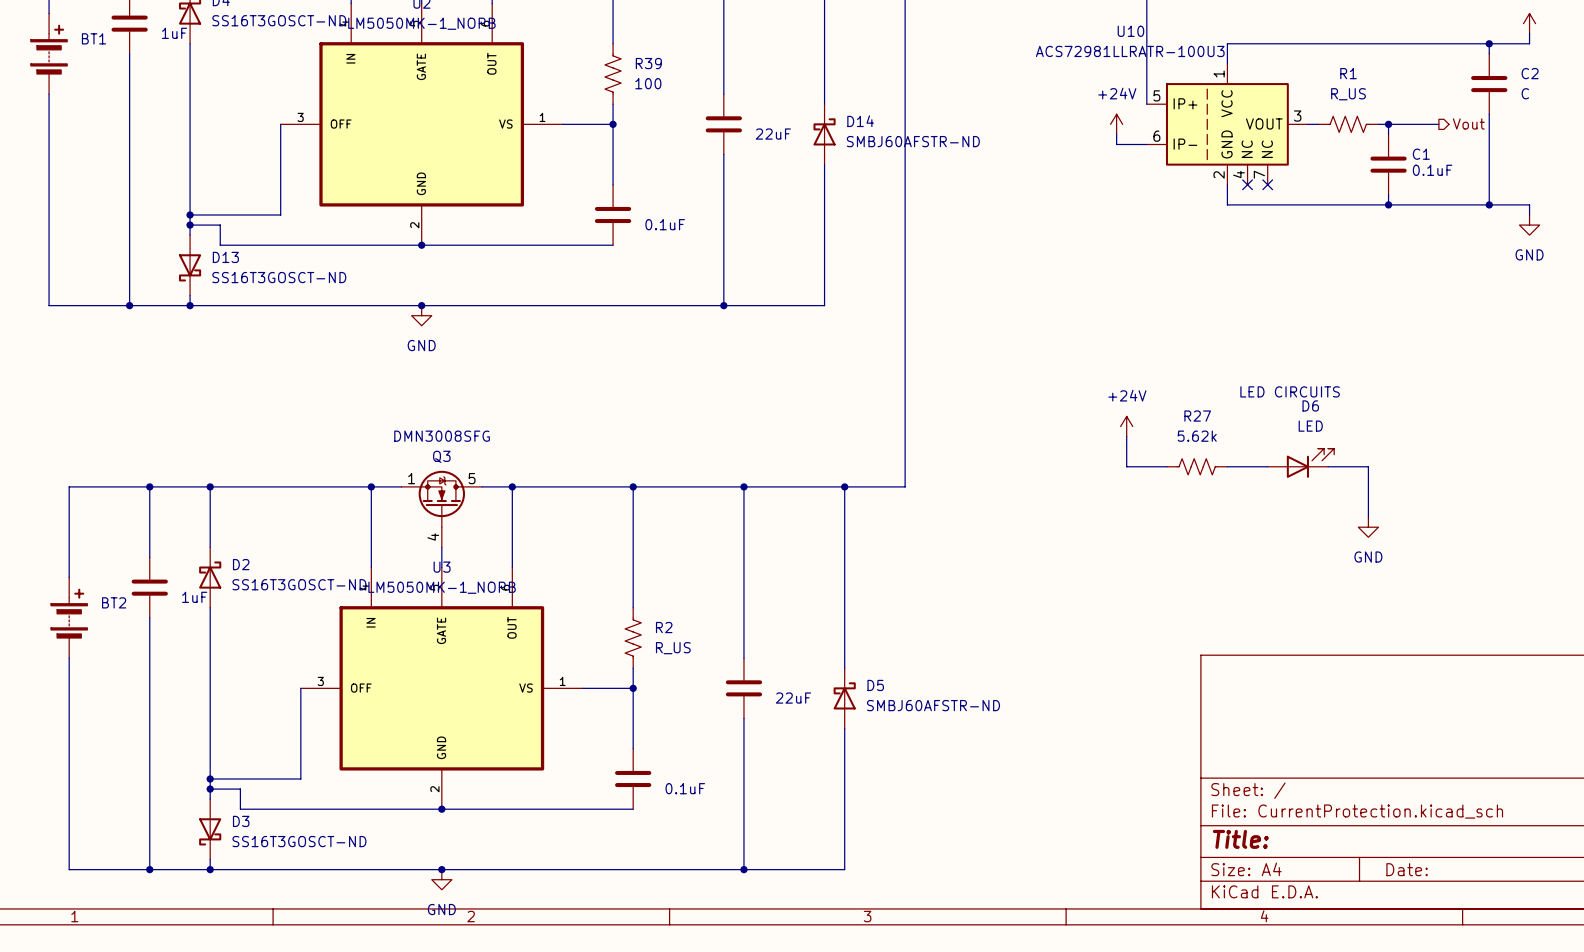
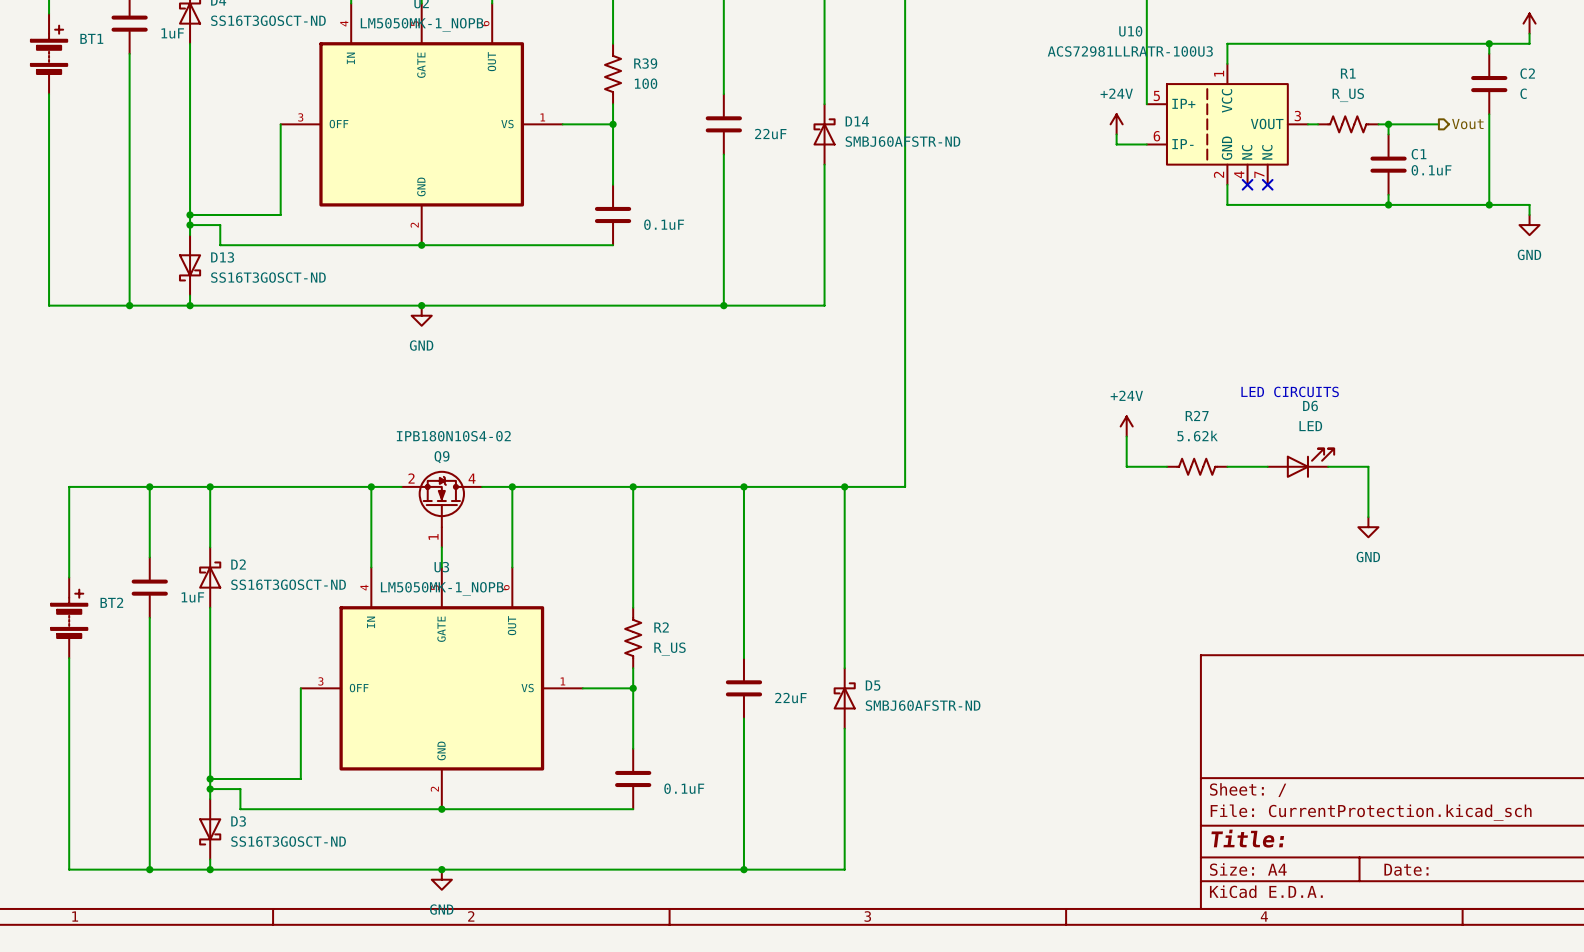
Q3 value: DMN3008SFG (442, 436) -> IPB180N10S4-02 (453, 436)
Q3 name: Q3 (441, 456) -> Q9 (442, 457)
Q3 pin number: 1 (411, 478) -> 2 (411, 478)
Q3 pin number: 5 (472, 478) -> 4 (472, 478)
Q3 pin number: 4 (433, 537) -> 1 (433, 536)

